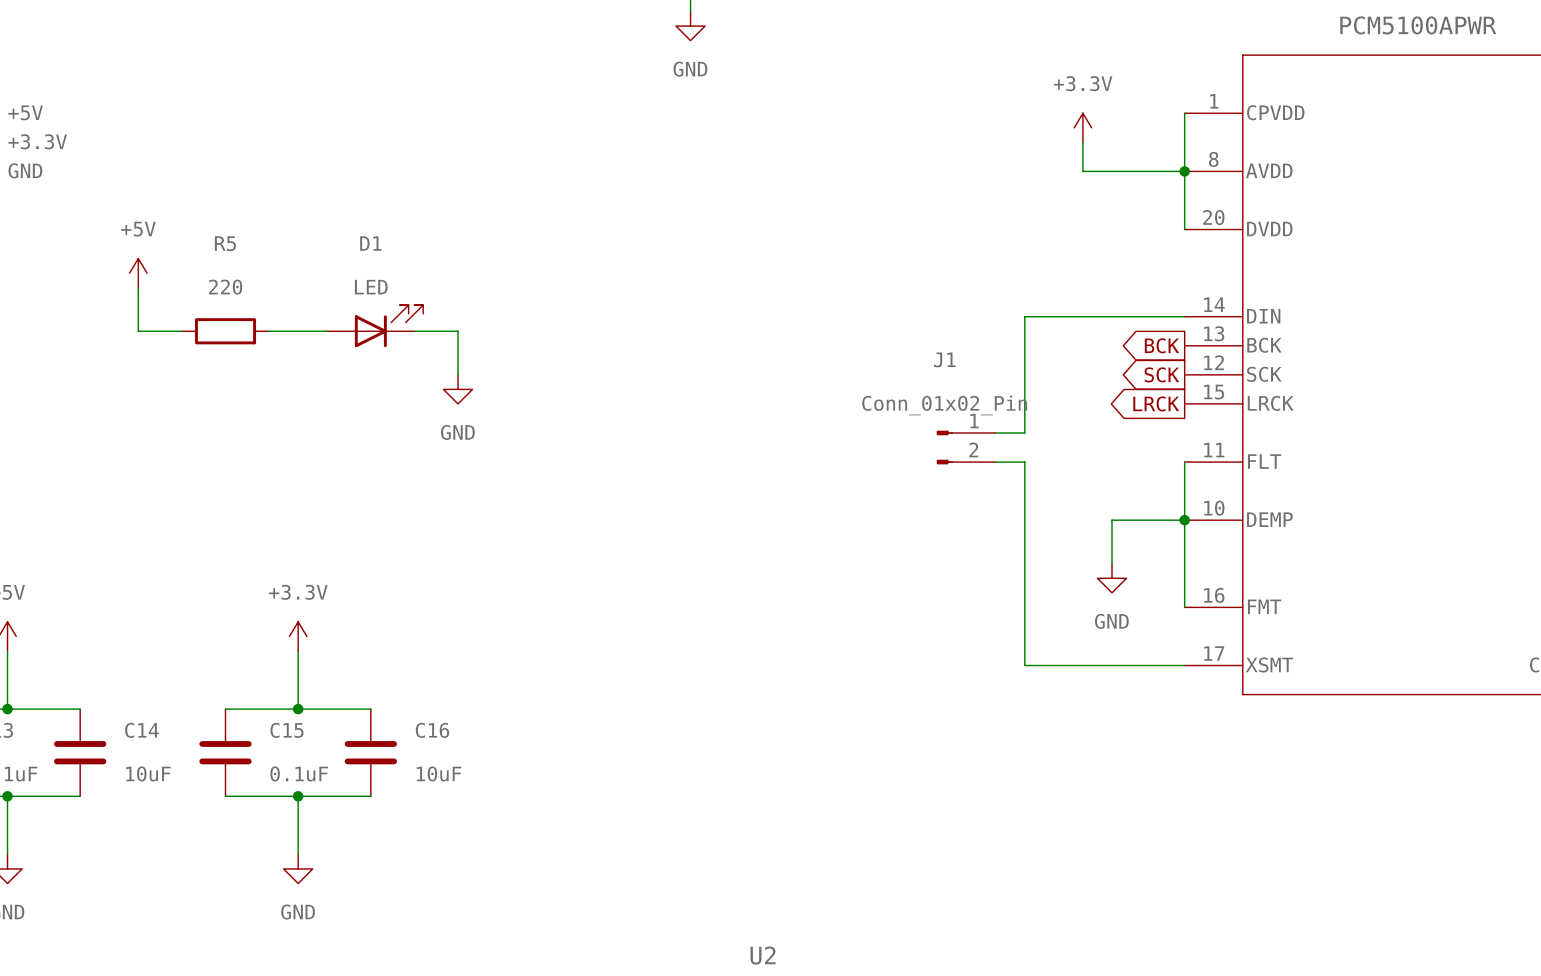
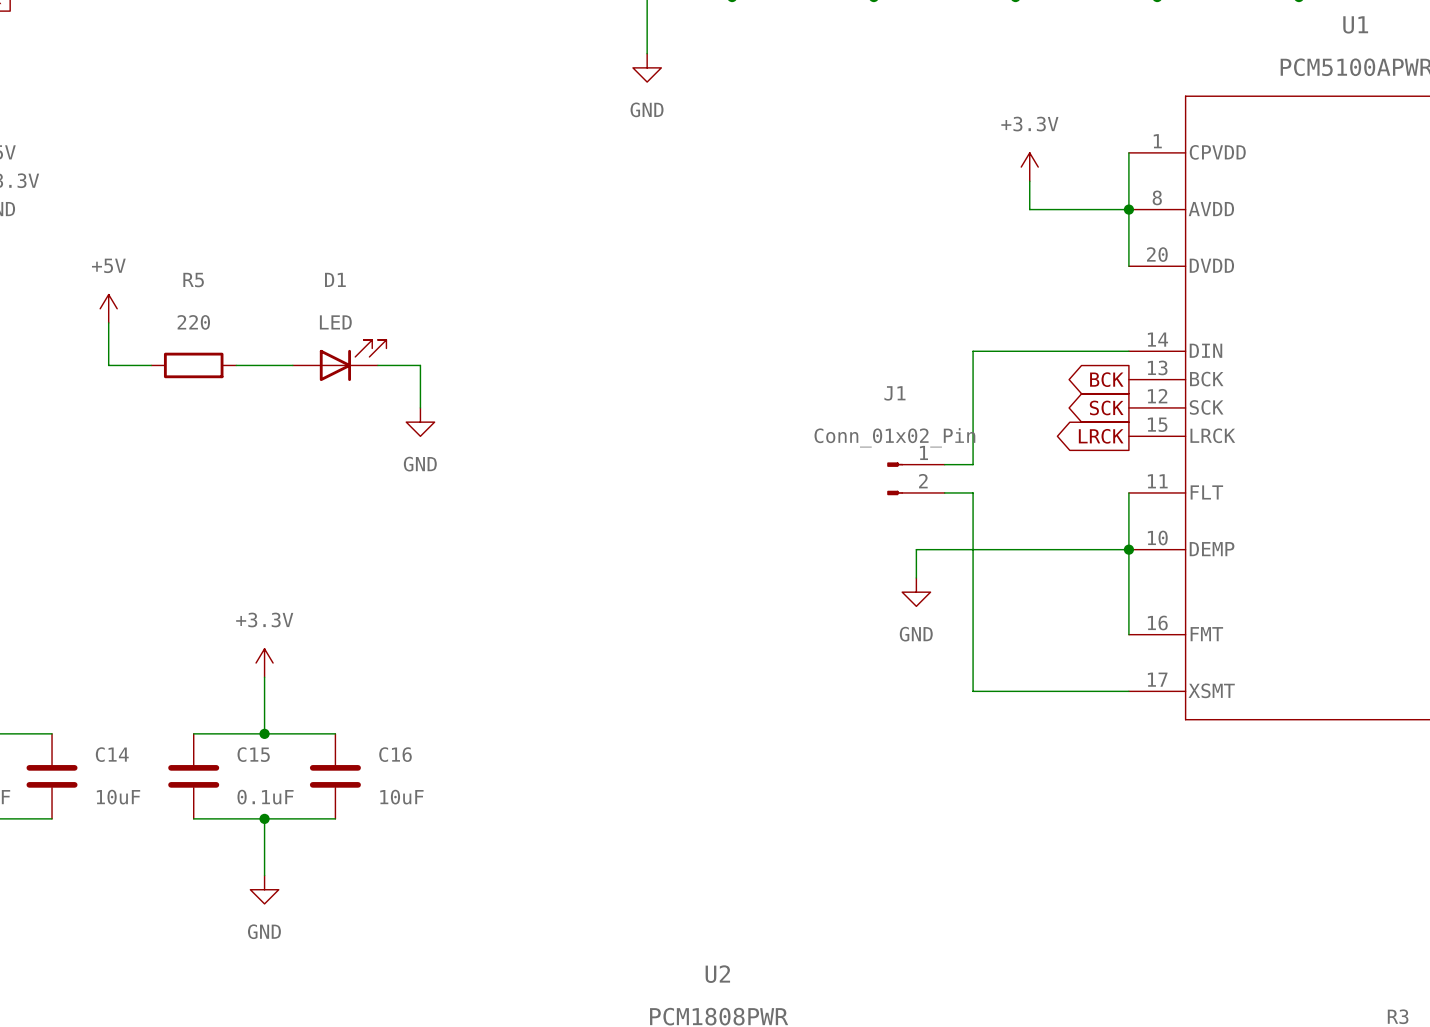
wire: (1112, 520) (1112, 563) -> (1058, 549) (916, 549) (916, 578)
power symbol position: GND (1112, 578) -> GND (916, 592)

